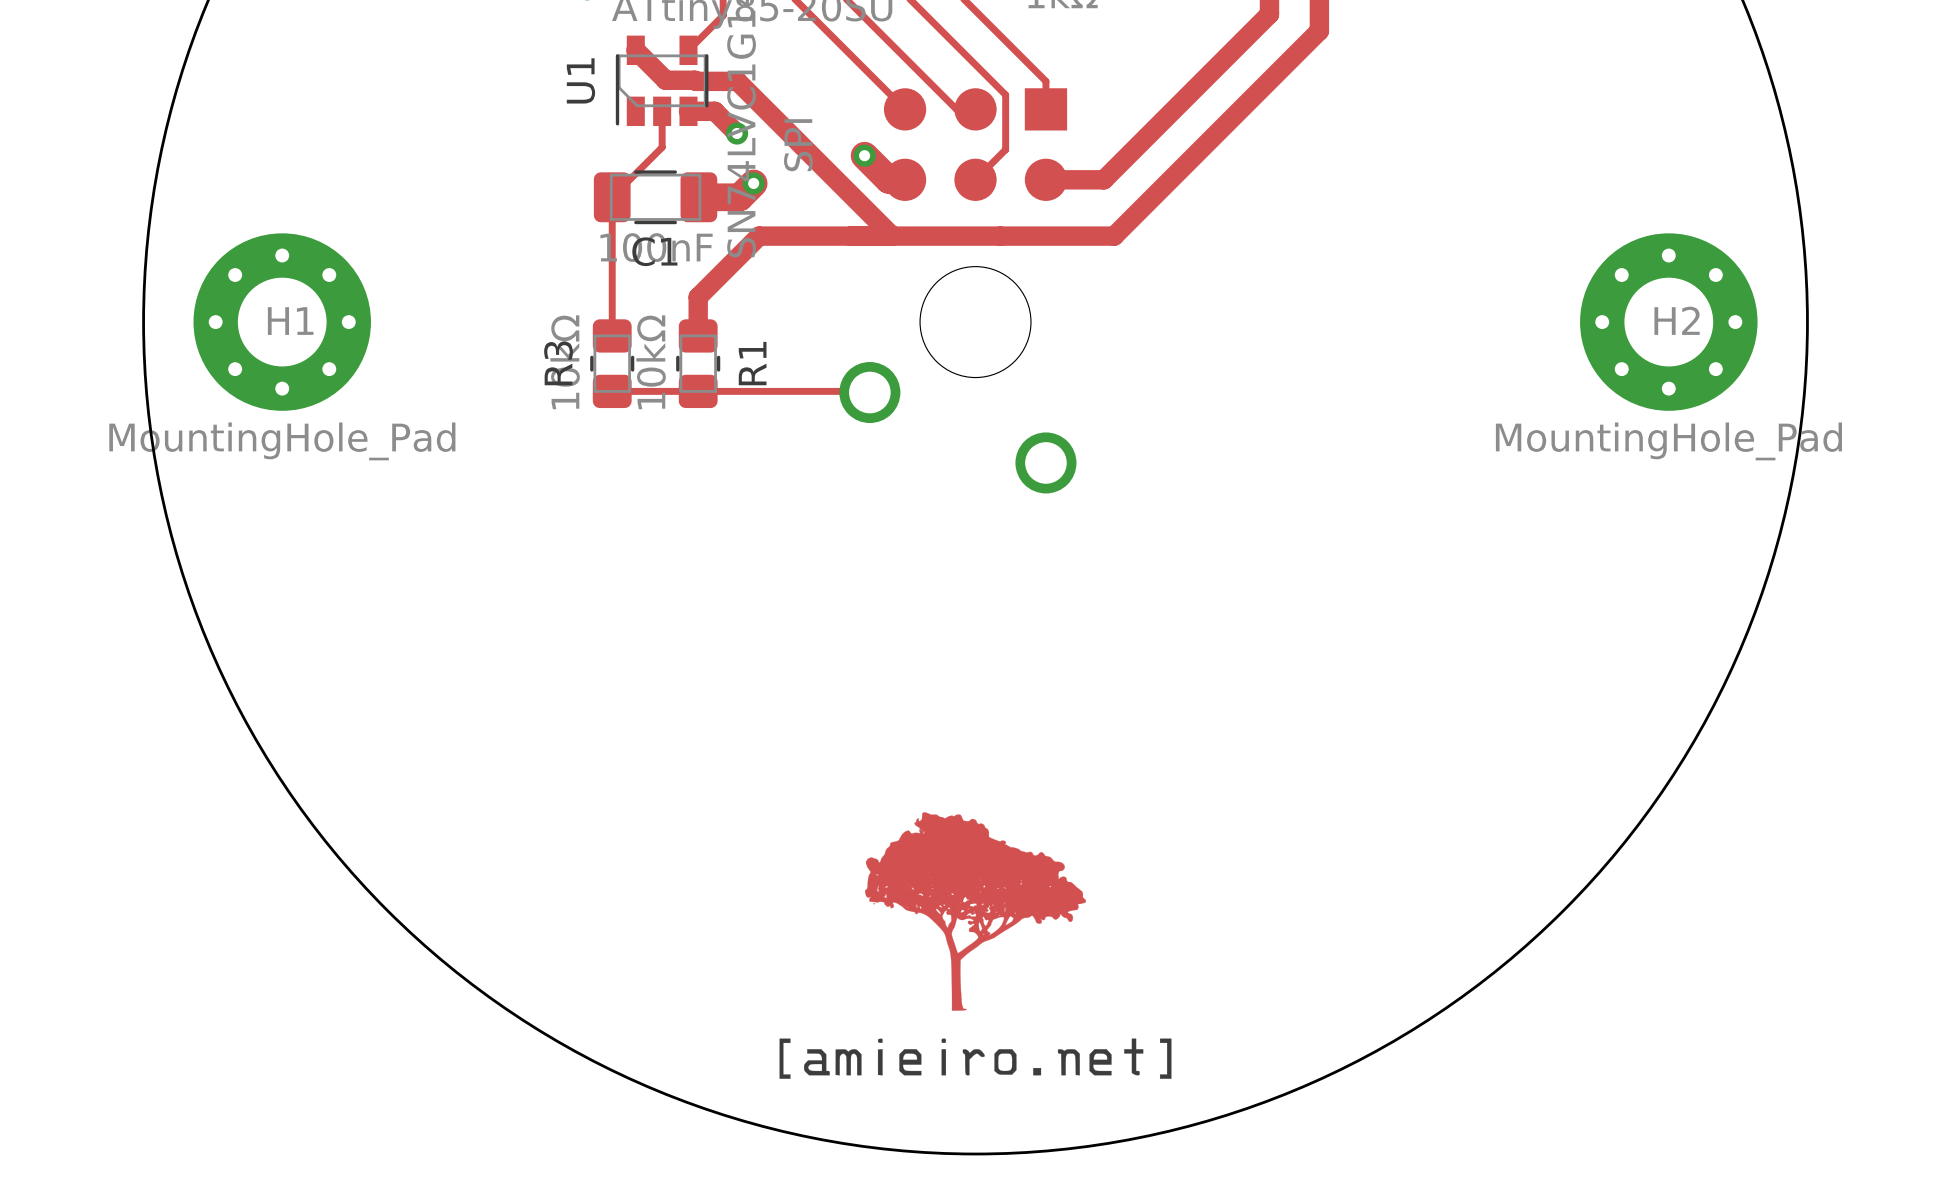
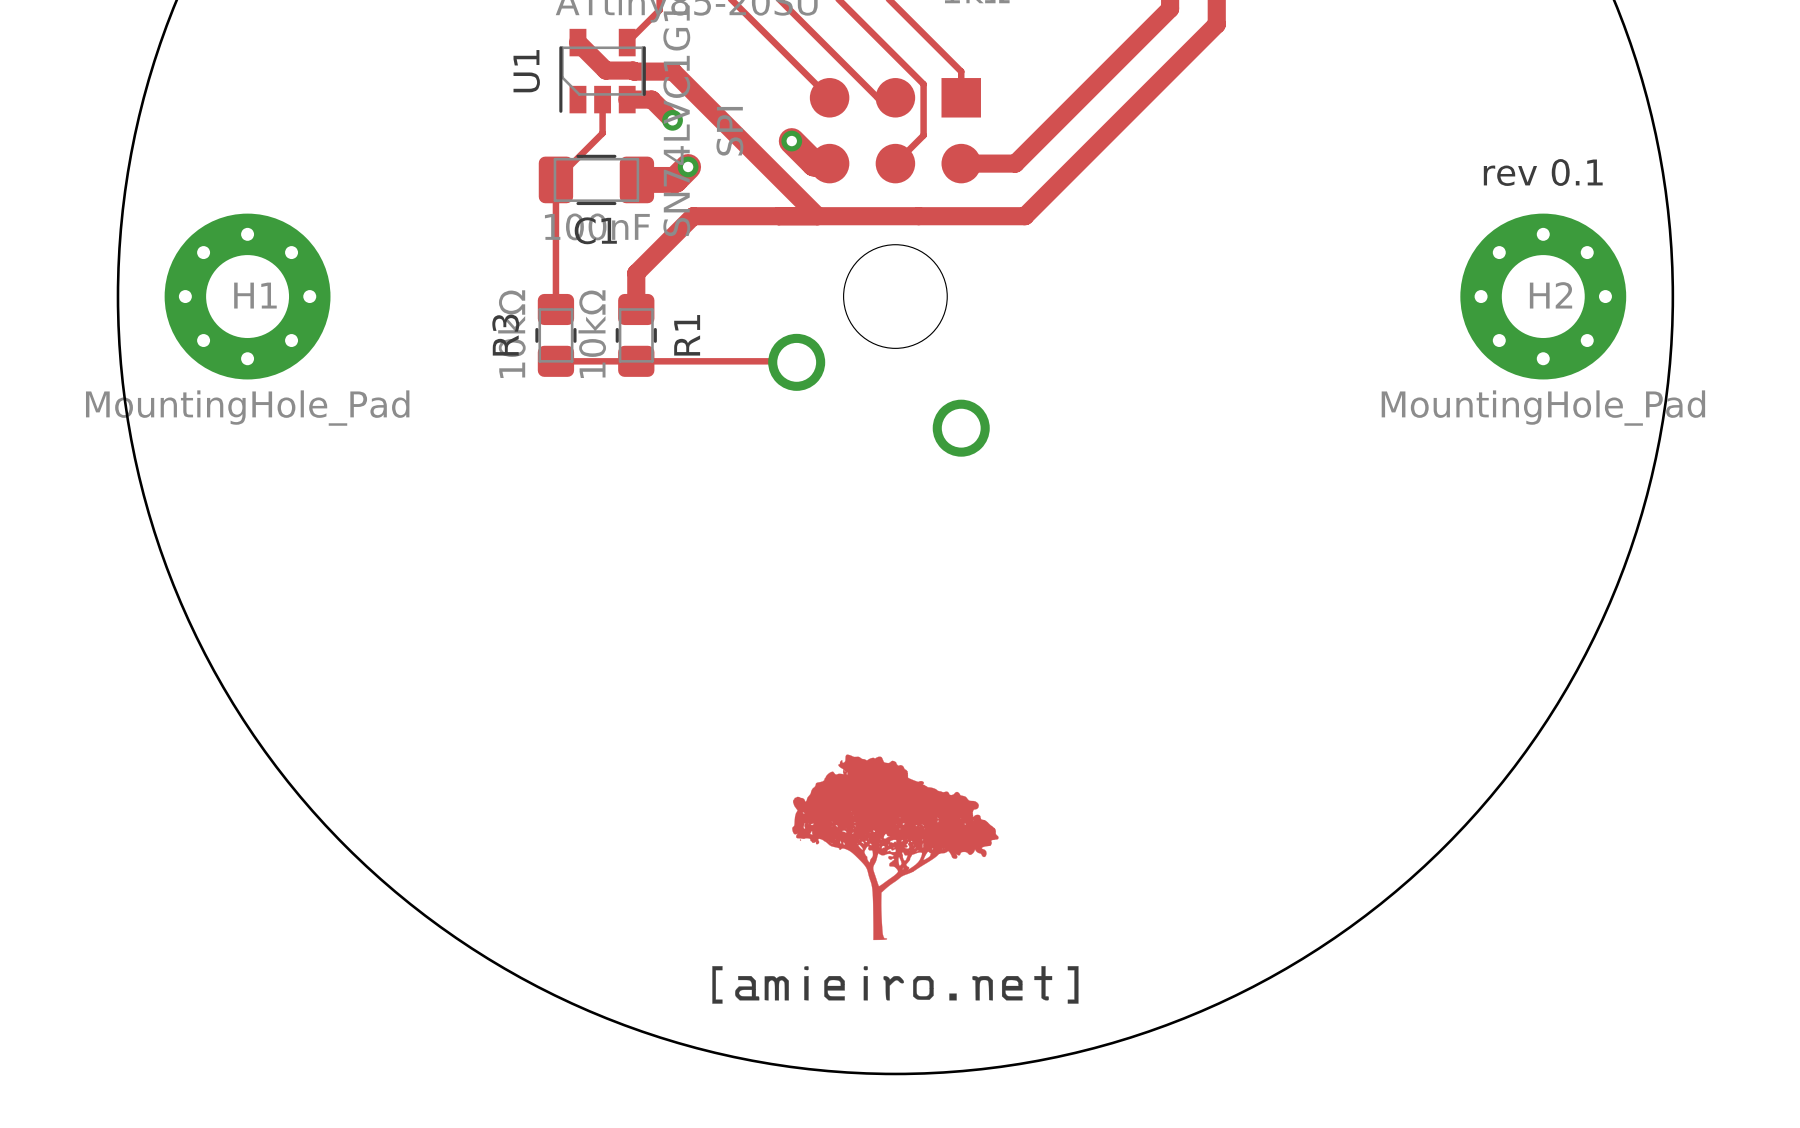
text: none -> rev 0.1 (1543, 172)

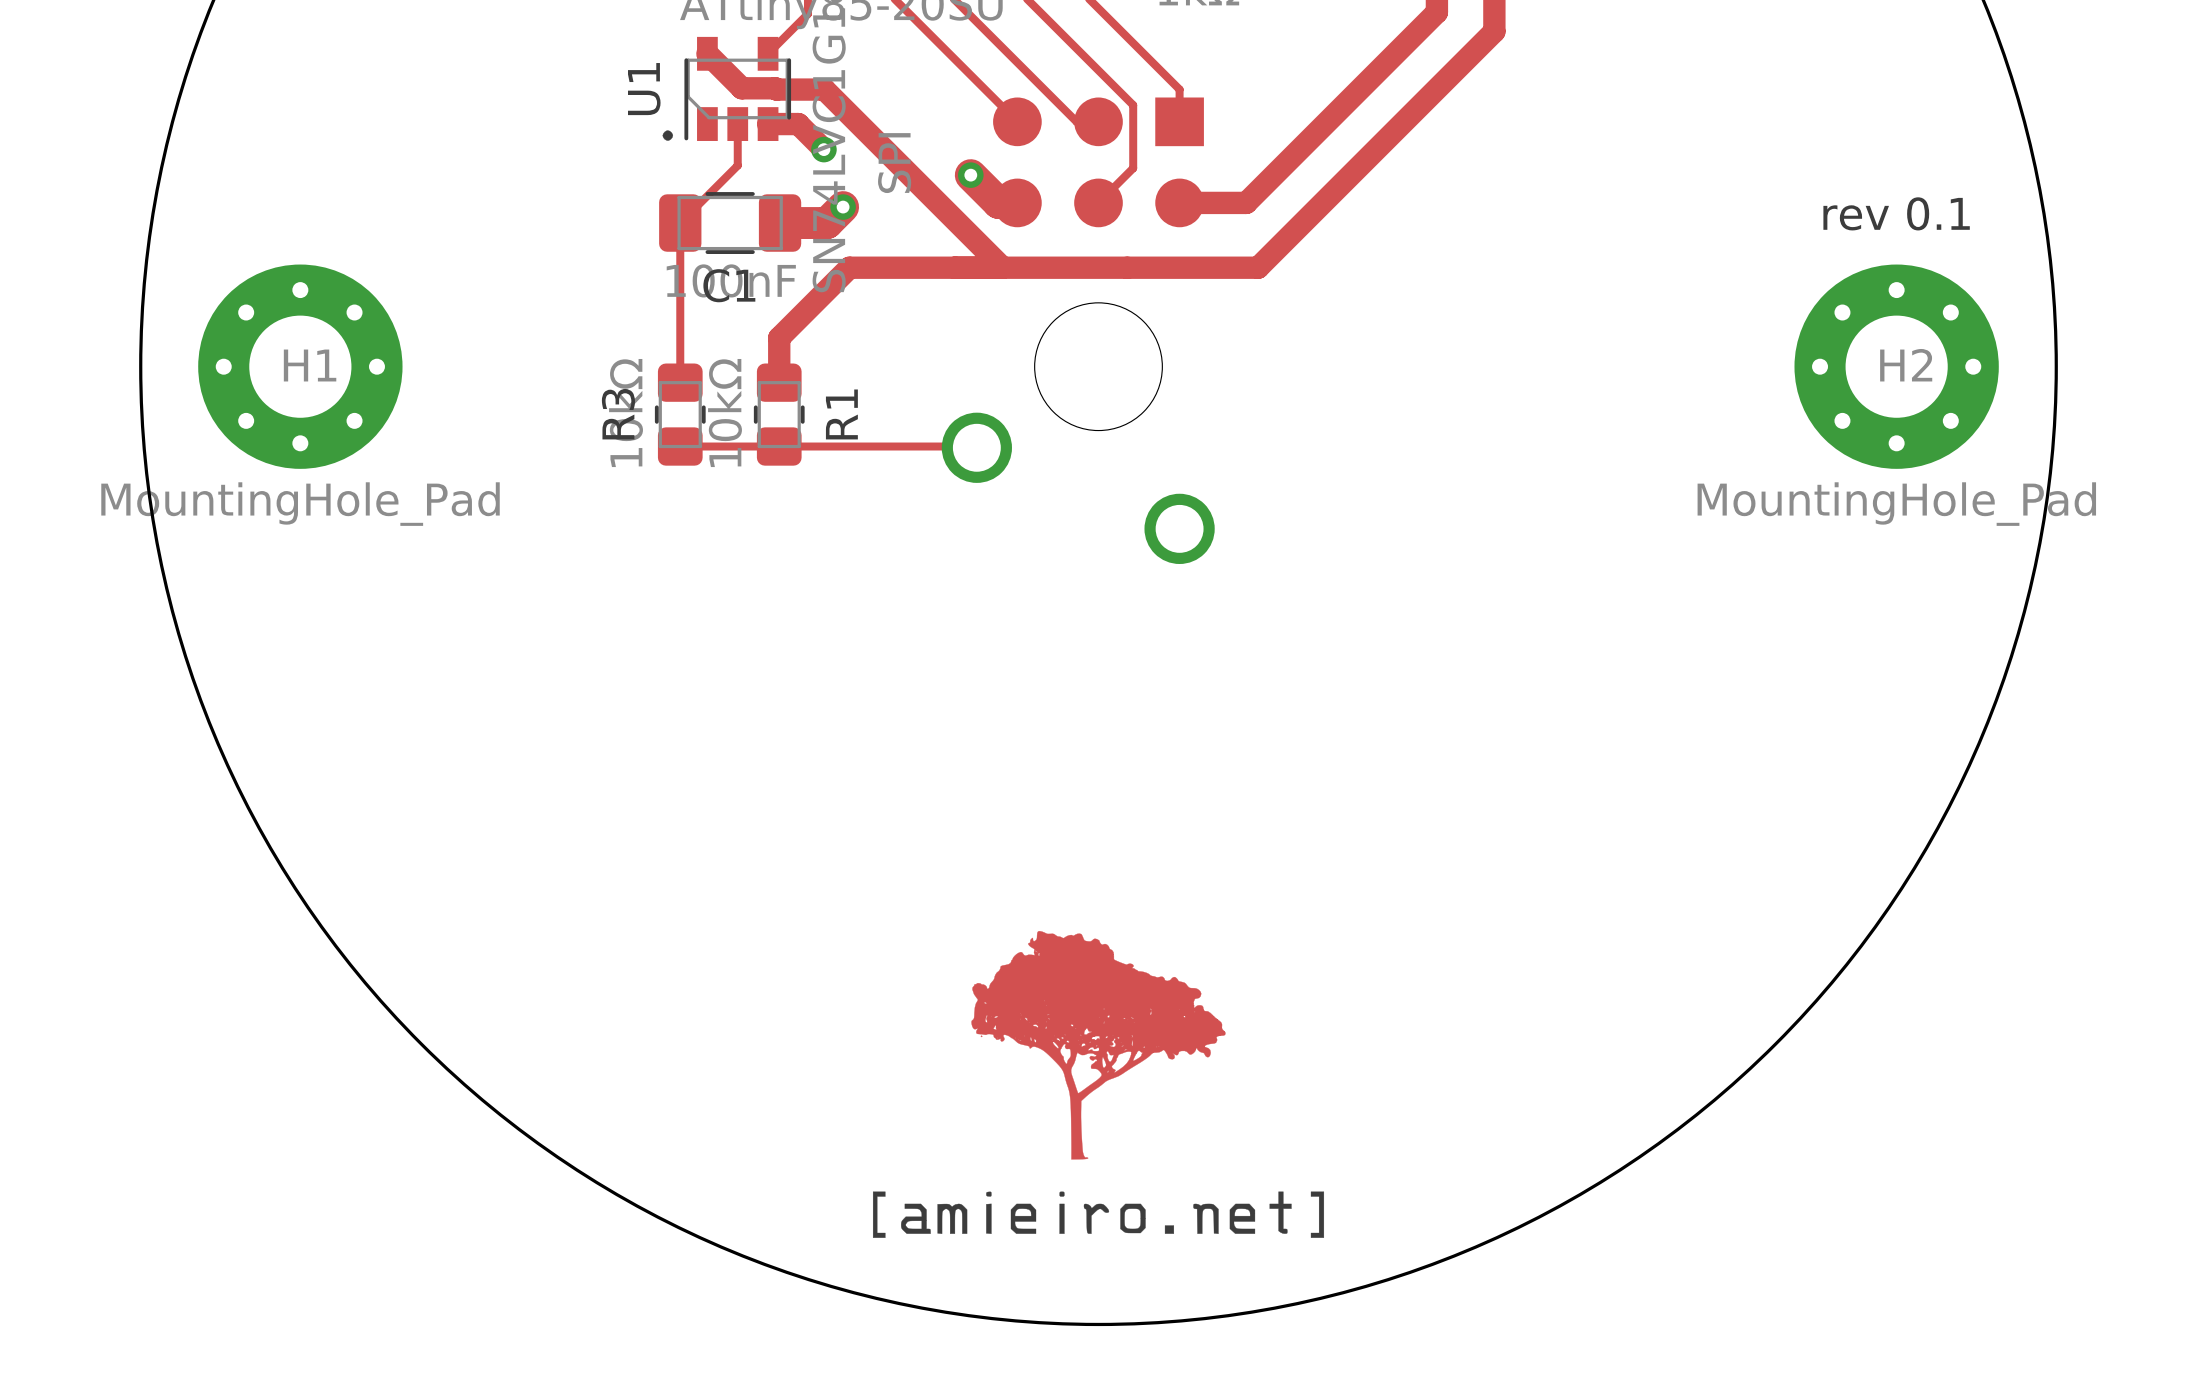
drawing: none -> [662, 130, 674, 141]

